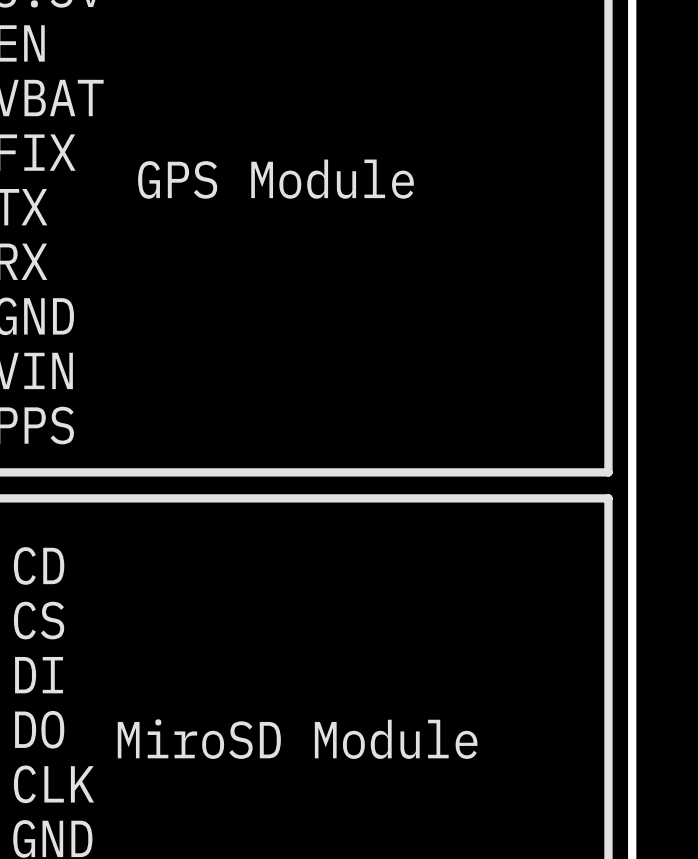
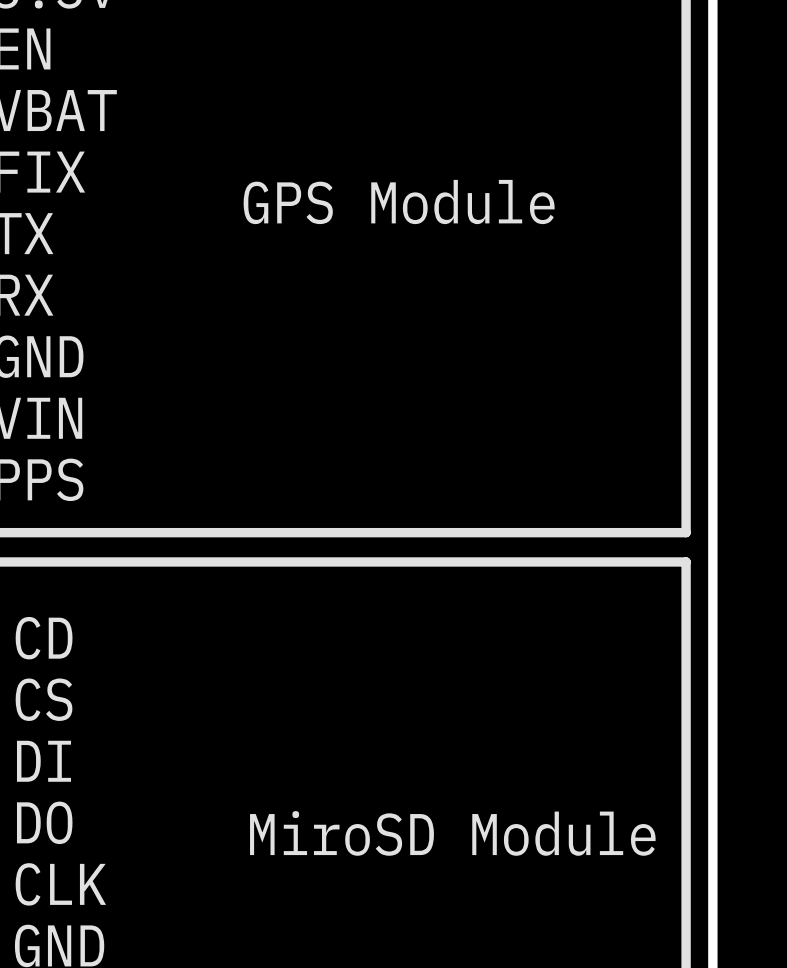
text position: GPS Module (275, 179) -> GPS Module (399, 202)
text position: MiroSD Module (297, 739) -> MiroSD Module (452, 833)

